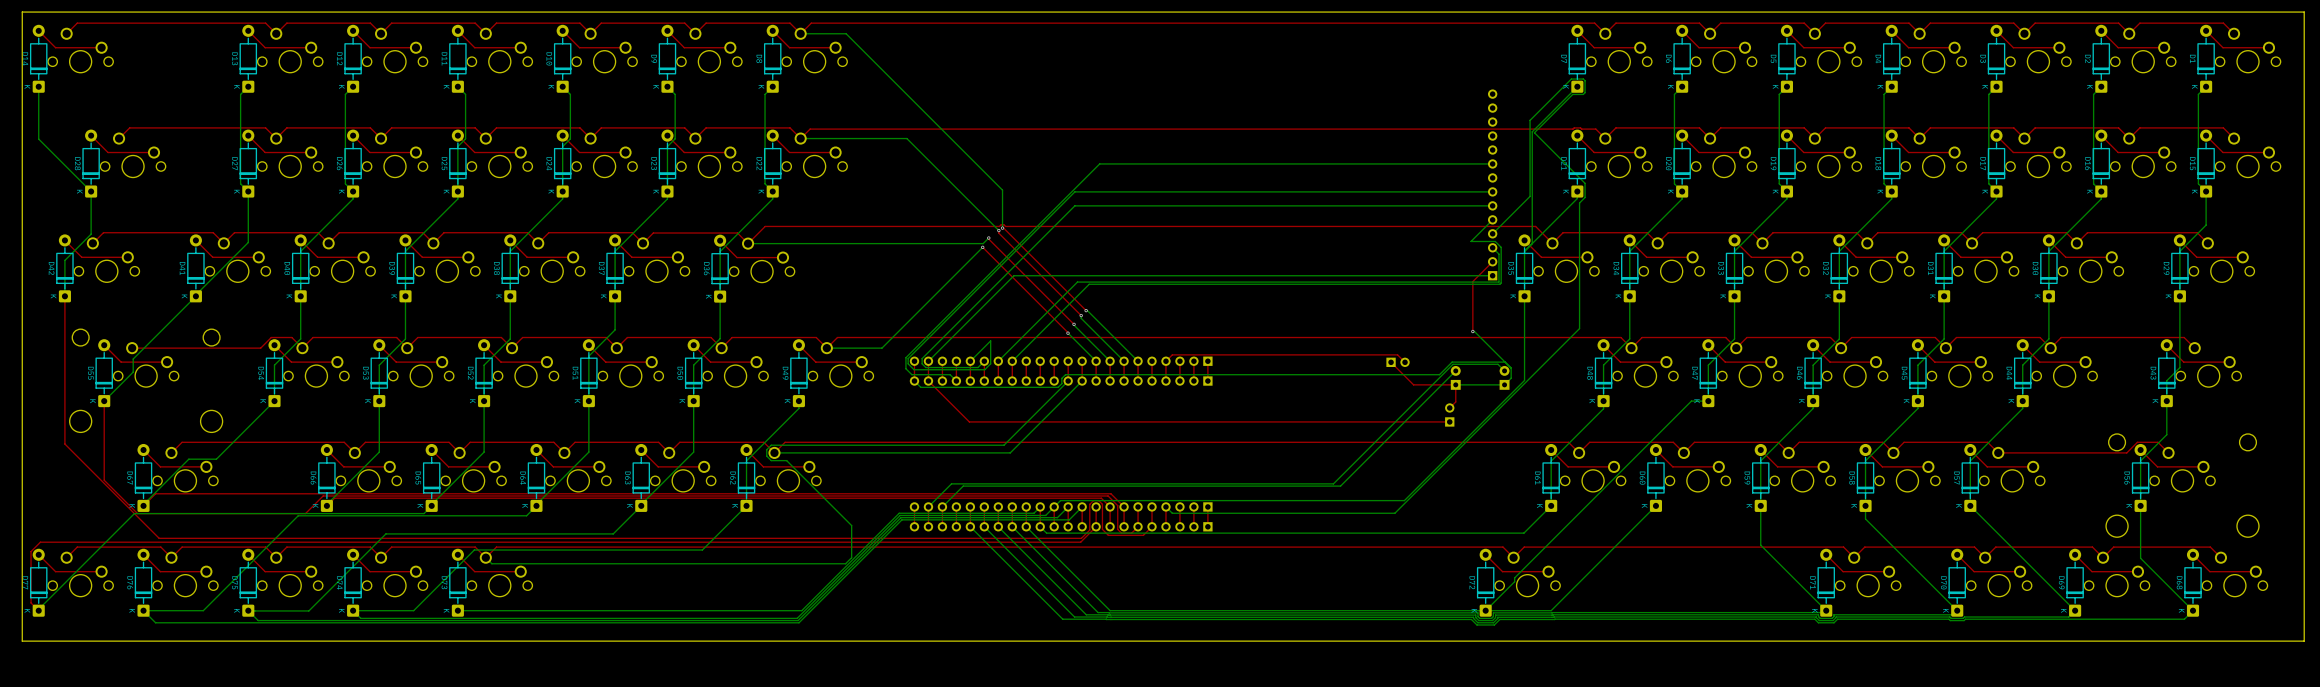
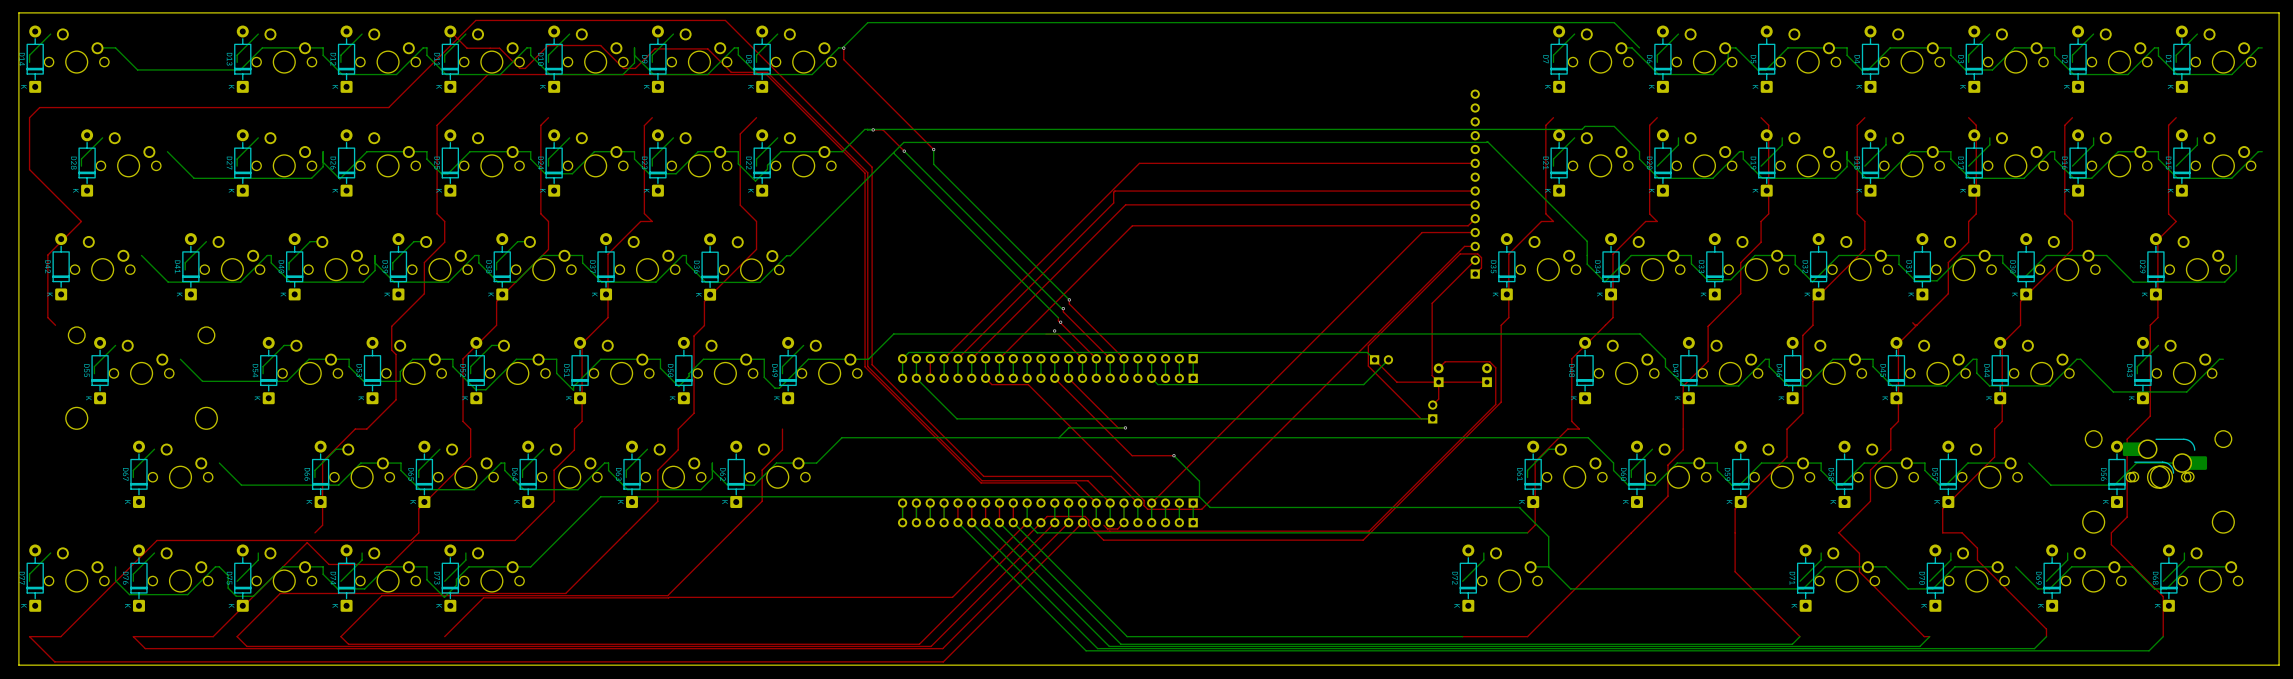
top track: (38, 30) (55, 47) (101, 47) -> none
top track: (248, 30) (265, 47) (311, 47) -> none
top track: (353, 30) (369, 47) (415, 47) -> none
top track: (562, 30) (579, 47) (625, 47) -> none
top track: (667, 30) (684, 47) (730, 47) -> none
top track: (772, 30) (789, 47) (835, 47) -> none
top track: (1577, 30) (1594, 47) (1640, 47) -> none
top track: (1682, 30) (1699, 47) (1745, 47) -> none
top track: (1786, 30) (1803, 47) (1849, 47) -> none
top track: (1891, 30) (1908, 47) (1954, 47) -> none
top track: (1996, 30) (2013, 47) (2059, 47) -> none
top track: (2101, 30) (2118, 47) (2164, 47) -> none
top track: (2206, 30) (2222, 47) (2268, 47) -> none
bottom track: none -> (50, 34) (29, 55) (29, 62)
bottom track: none -> (258, 34) (237, 55) (237, 62)
bottom track: none -> (362, 34) (340, 55) (340, 62)
bottom track: none -> (465, 34) (444, 55) (444, 62)
bottom track: none -> (569, 34) (548, 55) (548, 62)
bottom track: none -> (673, 34) (652, 55) (652, 62)
bottom track: none -> (777, 34) (756, 55) (756, 62)
bottom track: (800, 33) (846, 33) (1002, 190) (1002, 228) -> none
bottom track: none -> (1574, 34) (1553, 55) (1553, 62)
bottom track: none -> (1678, 34) (1657, 55) (1657, 62)
bottom track: none -> (1989, 34) (1968, 55) (1968, 62)
bottom track: none -> (2093, 34) (2072, 55) (2072, 62)
bottom track: none -> (2197, 34) (2176, 55) (2176, 62)
top track: (2234, 33) (2223, 23) (2139, 23) (2129, 33) (2118, 23) (2035, 23) (2024, 33) (2013, 23) (1930, 23) (1919, 33) (1909, 23) (1825, 23) (1814, 33) (1804, 23) (1720, 23) (1710, 33) (1699, 23) (1615, 23) (1605, 33) (1594, 23) (811, 23) (800, 33) (790, 23) (706, 23) (695, 33) (684, 23) (601, 23) (590, 33) (580, 23) (496, 23) (485, 33) (475, 23) (391, 23) (381, 33) (370, 23) (286, 23) (276, 33) (265, 23) (77, 23) (66, 33) -> none
bottom track: none -> (634, 47) (634, 62) (622, 74) (549, 74) (530, 55) (530, 47) (526, 47) (500, 74) (446, 74) (426, 55) (426, 47) (423, 47) (396, 74) (342, 74) (323, 55) (323, 47) (262, 47) (240, 69) (137, 69) (115, 47) (100, 47)
top track: none -> (843, 48) (843, 59) (933, 149)
via: none -> (843, 48)
bottom track: none -> (1639, 47) (1614, 22) (867, 22) (812, 74) (757, 74) (738, 54) (738, 47) (734, 47) (707, 74) (653, 74) (634, 55)
bottom track: none -> (2262, 47) (2258, 47) (2231, 74) (2177, 74) (2158, 55) (2158, 47) (2154, 47) (2127, 74) (2073, 74) (2054, 55) (2054, 47) (2014, 47) (1992, 69) (1965, 69) (1950, 55) (1950, 47) (1890, 47) (1868, 69) (1861, 69) (1847, 55) (1847, 47) (1787, 47) (1765, 69) (1757, 69) (1735, 47) (1728, 47) (1728, 59) (1712, 74) (1658, 74) (1632, 47) (1624, 47)
bottom track: (38, 86) (38, 139) (91, 191) (91, 234) (64, 260) (64, 296) -> none
bottom track: (248, 86) (240, 94) (240, 183) (248, 191) (248, 242) (133, 359) (133, 372) (104, 401) -> none
bottom track: (353, 86) (345, 94) (345, 183) (353, 191) (353, 198) (300, 251) (300, 338) (274, 365) (274, 401) (216, 459) (188, 459) (143, 505) -> none
bottom track: (457, 86) (465, 94) (465, 138) (457, 146) (457, 198) (405, 251) (405, 338) (379, 365) (379, 452) (326, 505) -> none
bottom track: (562, 86) (570, 94) (570, 138) (562, 146) (562, 198) (510, 251) (510, 338) (484, 365) (484, 452) (423, 513) (134, 513) (38, 610) -> none
bottom track: (667, 86) (675, 94) (675, 138) (667, 146) (667, 198) (615, 251) (615, 329) (588, 356) (588, 452) (536, 505) (526, 515) (298, 515) (203, 610) (143, 610) (155, 622) (799, 622) (901, 519) (1069, 519) (1082, 506) -> (1068, 522) (1068, 503)
bottom track: (772, 86) (765, 94) (765, 183) (772, 191) (772, 198) (720, 251) (720, 338) (693, 365) (693, 452) (613, 533) (385, 533) (308, 610) (248, 610) (258, 620) (798, 620) (901, 517) (1057, 517) (1068, 506) -> (1054, 522) (1054, 503)
bottom track: (1577, 86) (1532, 131) (1532, 243) -> none
bottom track: (1682, 86) (1674, 94) (1674, 183) (1682, 191) (1682, 198) (1629, 251) (1629, 338) (1603, 365) (1603, 408) (1551, 461) (1551, 505) (1523, 533) (1046, 533) -> (1527, 532) (1037, 532) (1033, 528)
bottom track: (1786, 86) (1779, 94) (1779, 183) (1786, 191) (1786, 198) (1734, 251) (1734, 338) (1708, 365) (1708, 401) (1691, 401) (1514, 577) (1514, 581) (1485, 610) -> none
bottom track: (1891, 86) (1884, 94) (1884, 183) (1891, 191) (1891, 198) (1839, 251) (1839, 338) (1813, 365) (1813, 408) (1760, 460) (1760, 545) (1826, 610) (1824, 612) (1493, 612) (1491, 618) (1479, 618) (1477, 612) (1098, 612) -> (1799, 636) (1792, 644) (1121, 644) (1084, 607)
bottom track: (1996, 86) (1988, 94) (1988, 183) (1996, 191) (1996, 198) (1944, 251) (1944, 338) (1917, 365) (1917, 408) (1865, 460) (1865, 518) (1957, 610) (1953, 614) (1833, 614) (1832, 618) (1820, 618) (1818, 614) (1495, 615) (1492, 620) (1478, 620) (1475, 615) (1086, 614) -> (1929, 636) (1919, 646) (1109, 646) (1072, 609)
bottom track: (2101, 86) (2093, 94) (2093, 183) (2101, 191) (2101, 198) (2048, 251) (2048, 338) (2022, 365) (2022, 408) (1970, 460) (1970, 505) (2075, 610) (2068, 617) (1836, 617) (1833, 620) (1819, 620) (1816, 617) (1497, 617) (1493, 622) (1477, 622) (1473, 617) (1074, 617) -> (2046, 636) (2034, 648) (1097, 648) (1061, 612)
bottom track: (2206, 86) (2198, 94) (2198, 183) (2206, 191) (2206, 225) (2179, 251) (2179, 367) (2166, 380) (2166, 434) (2140, 460) (2140, 558) (2193, 610) (2184, 619) (1837, 619) (1834, 622) (1818, 622) (1814, 619) (1499, 619) (1494, 624) (1476, 624) (1471, 619) (1062, 619) -> (2163, 636) (2149, 650) (1086, 650) (1049, 614)
top track: none -> (1553, 117) (1545, 125) (1545, 213) (1553, 221) (1541, 221) (1508, 254) (1508, 317) (1501, 325) (1501, 402) (1363, 540) (1103, 540) (1094, 531)
top track: none -> (1657, 117) (1649, 125) (1649, 213) (1657, 221) (1645, 221) (1613, 254) (1613, 317) (1571, 358) (1571, 421) (1579, 429) (1567, 429) (1535, 461) (1535, 525) (1527, 532)
top track: none -> (1761, 117) (1768, 125) (1768, 213) (1761, 221) (1761, 242) (1740, 262) (1740, 293) (1708, 326) (1708, 361) (1683, 386) (1683, 449) (1667, 465) (1667, 496) (1527, 636) (1462, 636)
top track: none -> (1864, 117) (1857, 125) (1857, 213) (1864, 221) (1864, 249) (1812, 301) (1812, 325) (1802, 335) (1802, 413) (1787, 429) (1787, 457) (1735, 508) (1735, 571) (1799, 636)
top track: none -> (1968, 117) (1976, 125) (1976, 213) (1968, 221) (1968, 242) (1948, 262) (1948, 293) (1898, 343) (1898, 421) (1890, 429) (1890, 449) (1870, 470) (1870, 501) (1838, 532) (1859, 553) (1859, 571) (1924, 636) (1929, 636)
top track: none -> (2072, 117) (2064, 125) (2064, 213) (2072, 221) (2072, 249) (2020, 301) (2020, 325) (2002, 343) (2002, 421) (1994, 429) (1994, 457) (1942, 508) (1942, 532) (1962, 532) (1977, 548) (1977, 560) (2046, 629) (2046, 636)
top track: none -> (2176, 117) (2168, 125) (2168, 213) (2176, 221) (2157, 239) (2157, 317) (2150, 325) (2150, 416) (2127, 439) (2127, 517) (2111, 532) (2111, 544) (2163, 596) (2163, 636)
bottom track: none -> (867, 129) (873, 129)
top track: none -> (873, 129) (883, 129) (904, 151)
via: none -> (873, 129)
top track: (91, 135) (108, 152) (153, 152) -> none
top track: (248, 135) (265, 152) (311, 152) -> none
top track: (353, 135) (369, 152) (415, 152) -> none
top track: (457, 135) (474, 152) (520, 152) -> none
top track: (562, 135) (579, 152) (625, 152) -> none
top track: (667, 135) (684, 152) (730, 152) -> none
top track: (772, 135) (789, 152) (835, 152) -> none
top track: (1577, 135) (1594, 152) (1640, 152) -> none
top track: (1682, 135) (1699, 152) (1745, 152) -> none
top track: (1786, 135) (1803, 152) (1849, 152) -> none
top track: (1891, 135) (1908, 152) (1954, 152) -> none
top track: (1996, 135) (2013, 152) (2059, 152) -> none
top track: (2101, 135) (2118, 152) (2164, 152) -> none
top track: (2206, 135) (2222, 152) (2268, 152) -> none
bottom track: none -> (102, 137) (81, 159) (81, 166)
bottom track: none -> (258, 137) (237, 159) (237, 166)
bottom track: none -> (569, 137) (548, 159) (548, 166)
bottom track: none -> (673, 137) (652, 159) (652, 166)
bottom track: none -> (777, 137) (756, 159) (756, 166)
bottom track: (800, 138) (906, 138) (998, 230) -> none
bottom track: none -> (1574, 137) (1553, 159) (1553, 166)
bottom track: none -> (1678, 137) (1678, 144) (1657, 166)
bottom track: none -> (1782, 137) (1782, 144) (1761, 166)
bottom track: none -> (1886, 137) (1886, 144) (1864, 166)
bottom track: none -> (1989, 137) (1989, 144) (1968, 166)
bottom track: none -> (2093, 137) (2093, 144) (2072, 166)
bottom track: none -> (2197, 137) (2197, 144) (2176, 166)
top track: (2234, 138) (2223, 127) (2139, 127) (2129, 138) (2118, 127) (2035, 127) (2024, 138) (2013, 127) (1930, 127) (1919, 138) (1909, 127) (1825, 127) (1814, 138) (1804, 127) (1720, 127) (1710, 138) (1699, 127) (1615, 127) (1605, 138) (1595, 129) (1580, 127) (810, 129) (800, 138) (790, 127) (706, 127) (695, 138) (684, 127) (601, 127) (590, 138) (580, 127) (496, 127) (485, 138) (475, 127) (391, 127) (381, 138) (370, 127) (286, 127) (276, 138) (265, 127) (129, 127) (119, 138) -> none
bottom track: none -> (933, 149) (933, 164) (1069, 299)
via: none -> (933, 149)
bottom track: none -> (904, 151) (1063, 308)
via: none -> (904, 151)
bottom track: none -> (323, 151) (323, 166) (311, 178) (194, 178) (167, 151)
bottom track: none -> (1847, 151) (1847, 166) (1835, 178) (1762, 178) (1743, 159) (1743, 151) (1739, 151) (1712, 178) (1658, 178) (1639, 159) (1639, 151) (1614, 126) (1585, 126) (1582, 129) (864, 129) (842, 151) (781, 151) (755, 181) (738, 163) (738, 151) (698, 151) (676, 173) (649, 173) (634, 159) (634, 151) (594, 151) (572, 173) (545, 173) (530, 159) (530, 151) (470, 151) (447, 173) (441, 173) (426, 159) (426, 151) (367, 151) (339, 178) (323, 162)
bottom track: none -> (2262, 151) (2258, 151) (2231, 178) (2177, 178) (2158, 159) (2158, 151) (2118, 151) (2091, 178) (2073, 178) (2054, 159) (2054, 151) (2050, 151) (2024, 178) (1970, 178) (1950, 159) (1950, 151) (1910, 151) (1884, 178) (1866, 178) (1847, 159)
bottom track: none -> (893, 152) (1058, 317)
bottom track: (1492, 163) (1099, 163) (905, 357) (905, 368) (911, 374) (950, 374) (956, 381) -> (944, 358) (944, 378)
bottom track: (1492, 191) (1074, 191) (908, 358) (908, 363) (914, 369) (984, 369) (990, 363) (990, 340) (970, 361) -> (957, 378) (957, 358)
bottom track: (1577, 191) (1577, 198) (1524, 251) (1524, 380) (1404, 500) (1214, 500) -> none
bottom track: (1492, 205) (1074, 205) (922, 358) (922, 363) (925, 367) (978, 367) (984, 361) -> (971, 378) (971, 358)
bottom track: (1492, 219) (1471, 241) (1495, 241) (1501, 247) (1499, 284) (1089, 284) (1012, 361) -> (999, 378) (999, 358)
top track: (1002, 228) (1086, 310) -> none
via: (1002, 228) -> none
top track: (998, 230) (998, 233) (1081, 315) -> none
via: (998, 230) -> none
bottom track: (1492, 233) (1530, 196) (1530, 120) (1571, 79) (1583, 79) (1585, 80) (1585, 92) (1572, 94) (1534, 132) (1585, 183) (1585, 197) (1579, 202) (1579, 328) (1394, 513) (1172, 513) (1165, 506) -> (1151, 522) (1151, 503)
top track: (988, 238) (1074, 324) -> none
bottom track: (988, 238) (983, 243) (748, 243) -> none
via: (988, 238) -> none
top track: (64, 240) (81, 257) (127, 257) -> none
top track: (195, 240) (212, 257) (258, 257) -> none
top track: (300, 240) (317, 257) (363, 257) -> none
top track: (405, 240) (422, 257) (468, 257) -> none
top track: (510, 240) (527, 257) (573, 257) -> none
top track: (615, 240) (631, 257) (677, 257) -> none
top track: (720, 240) (737, 257) (782, 257) -> none
top track: (1524, 240) (1541, 257) (1587, 257) -> none
top track: (1629, 240) (1646, 257) (1692, 257) -> none
top track: (1734, 240) (1751, 257) (1797, 257) -> none
top track: (1839, 240) (1856, 257) (1902, 257) -> none
top track: (1944, 240) (1961, 257) (2007, 257) -> none
top track: (2048, 240) (2065, 257) (2111, 257) -> none
top track: (2179, 240) (2196, 257) (2242, 257) -> none
bottom track: none -> (206, 241) (185, 262) (185, 269)
bottom track: none -> (325, 241) (310, 241) (289, 262) (289, 269)
bottom track: none -> (429, 241) (413, 241) (392, 262) (392, 269)
bottom track: none -> (532, 241) (517, 241) (496, 262) (496, 269)
top track: (2207, 243) (2197, 232) (2087, 232) (2076, 243) (2066, 232) (1982, 232) (1972, 243) (1961, 232) (1877, 232) (1867, 243) (1856, 232) (1773, 232) (1762, 243) (1751, 232) (1668, 232) (1657, 243) (1647, 232) (1563, 232) (1552, 243) (1535, 226) (1005, 226) (1003, 224) (999, 226) (765, 226) (748, 243) (737, 233) (653, 233) (643, 243) (632, 232) (548, 232) (538, 243) (527, 232) (444, 232) (433, 243) (422, 232) (339, 232) (328, 243) (318, 232) (234, 232) (223, 243) (213, 232) (103, 232) (92, 243) -> none
top track: (982, 247) (1067, 333) -> none
bottom track: (982, 247) (881, 348) (826, 348) -> none
via: (982, 247) -> none
bottom track: (1492, 247) (1498, 254) (1498, 282) (1077, 282) (998, 361) -> (985, 378) (985, 358)
bottom track: none -> (375, 255) (375, 270) (363, 282) (290, 282) (271, 262) (271, 255) (267, 255) (240, 282) (168, 282) (141, 255)
bottom track: none -> (2236, 255) (2236, 270) (2224, 282) (2133, 282) (2106, 255) (2046, 255) (2024, 277) (2017, 277) (2002, 262) (2002, 255) (1962, 255) (1937, 280) (1915, 280) (1898, 264) (1898, 255) (1838, 255) (1812, 281) (1795, 264) (1795, 255) (1755, 255) (1730, 279) (1707, 279) (1691, 263) (1691, 255) (1631, 255) (1604, 281) (1587, 264) (1587, 241) (1487, 141) (903, 142) (790, 255) (786, 255) (760, 282) (705, 282) (686, 262) (686, 255) (682, 255) (655, 282) (601, 282) (582, 262) (582, 255) (542, 255) (515, 282) (498, 282) (478, 262) (478, 255) (475, 255) (448, 282) (394, 282) (375, 262)
bottom track: (1492, 275) (1013, 275) (928, 361) -> (1432, 418) (956, 418) (916, 378) (916, 358)
top track: (1472, 281) (1472, 331) -> (1455, 279) (1432, 303) (1432, 375) (1438, 382) (1487, 382)
top track: (64, 296) (64, 444) (159, 538) (1081, 538) (1089, 530) (1089, 504) (1093, 500) (1098, 500) (1102, 504) (1102, 524) -> (782, 429) (782, 449) (762, 470) (762, 501) (667, 595) (381, 595) (340, 636) (348, 644) (919, 644) (1047, 516) (1085, 516) (1088, 520)
via: none -> (1069, 299)
via: none -> (1063, 308)
bottom track: (1086, 310) (1138, 361) -> (1124, 378) (1124, 358)
via: (1086, 310) -> none
bottom track: (1081, 315) (1081, 318) (1124, 361) -> (1110, 378) (1110, 358)
via: (1081, 315) -> none
bottom track: (1074, 324) (1110, 361) -> (1096, 378) (1096, 358)
top track: none -> (1912, 322) (1916, 325)
top track: none -> (55, 325) (47, 317) (47, 255) (81, 221) (29, 169) (29, 117) (39, 107) (388, 107) (475, 20) (725, 20) (872, 167) (872, 364) (983, 476) (1111, 476) (1137, 503)
bottom track: (1472, 331) (1511, 368) (1511, 378) (1504, 384) (1455, 384) -> none
via: (1472, 331) -> none
bottom track: (1068, 333) (1096, 361) -> (1082, 378) (1082, 358)
top track: (104, 345) (121, 362) (167, 362) -> none
top track: (274, 345) (291, 362) (337, 362) -> none
top track: (379, 345) (396, 362) (442, 362) -> none
top track: (484, 345) (500, 362) (546, 362) -> none
top track: (588, 345) (605, 362) (651, 362) -> none
top track: (693, 345) (710, 362) (756, 362) -> none
top track: (798, 345) (815, 362) (861, 362) -> none
top track: (1603, 345) (1620, 362) (1666, 362) -> none
top track: (1708, 345) (1725, 362) (1771, 362) -> none
top track: (1813, 345) (1830, 362) (1876, 362) -> none
top track: (1917, 345) (1934, 362) (1980, 362) -> none
top track: (2022, 345) (2039, 362) (2085, 362) -> none
top track: (2166, 345) (2183, 362) (2229, 362) -> none
bottom track: none -> (115, 345) (94, 366) (94, 373)
bottom track: none -> (299, 345) (284, 345) (263, 366) (263, 373)
bottom track: none -> (506, 345) (491, 345) (470, 366) (470, 373)
bottom track: none -> (803, 345) (782, 366) (782, 373)
bottom track: none -> (2158, 345) (2137, 366) (2137, 373)
top track: (2194, 348) (2184, 337) (2061, 337) (2050, 348) (2040, 337) (1956, 337) (1945, 348) (1935, 337) (1851, 337) (1841, 348) (1830, 337) (1746, 337) (1736, 348) (1725, 337) (1642, 337) (1631, 348) (1620, 337) (837, 337) (826, 348) (816, 337) (732, 337) (721, 348) (710, 337) (627, 337) (616, 348) (606, 337) (522, 337) (512, 348) (501, 337) (417, 337) (407, 348) (396, 337) (313, 337) (302, 348) (291, 337) (271, 337) (260, 348) (132, 348) -> none
top track: (914, 361) (914, 381) -> none
top track: (928, 361) (928, 381) (969, 421) (1438, 421) -> (1475, 274) (1481, 267) (1481, 257) (1477, 253) (1460, 253) (1368, 345) (1368, 366) (1421, 418)
top track: (956, 361) (956, 381) -> (944, 358) (1139, 163) (1475, 163)
top track: (970, 361) (970, 381) -> (957, 358) (1113, 202) (1114, 191) (1475, 191)
top track: (984, 361) (984, 381) -> (971, 358) (1125, 204) (1475, 204)
top track: (998, 361) (998, 381) -> (1475, 246) (1464, 246) (1201, 509) (1147, 509) (1144, 505) (1144, 500) (1028, 384) (991, 384) (985, 378)
top track: (1012, 361) (1012, 381) -> (999, 358) (1132, 225) (1468, 225) (1475, 218)
top track: (1026, 361) (1026, 381) -> none
bottom track: none -> (1013, 358) (1013, 378)
top track: (1040, 361) (1040, 381) -> none
bottom track: none -> (1027, 358) (1027, 378)
top track: (1054, 361) (1054, 381) -> none
bottom track: none -> (1040, 358) (1040, 378)
top track: (1068, 361) (1068, 381) -> (1173, 455) (1132, 455) (1054, 378)
top track: (1082, 361) (1082, 381) -> (1125, 427) (1118, 427) (1068, 378)
top track: (1096, 361) (1096, 381) -> (1082, 358) (1057, 334) (1045, 334)
top track: (1110, 361) (1110, 381) -> (1096, 358) (1058, 320) (1058, 317)
top track: (1124, 361) (1124, 381) -> (1110, 358) (1063, 311) (1063, 308)
top track: (1138, 361) (1138, 381) -> (1124, 358) (1069, 304) (1069, 299)
top track: (1152, 361) (1152, 381) -> none
bottom track: none -> (1137, 358) (1137, 378)
bottom track: none -> (1151, 358) (1151, 378) (1157, 384) (1363, 384) (1388, 359)
top track: (1179, 361) (1179, 381) -> none
bottom track: none -> (1165, 358) (1165, 378)
top track: (1193, 361) (1193, 381) -> none
bottom track: none -> (1179, 358) (1179, 378)
top track: (1207, 361) (1207, 381) -> none
bottom track: none -> (1193, 358) (1193, 378)
bottom track: none -> (2223, 359) (2219, 359) (2186, 391) (2113, 391) (2080, 359) (2076, 359) (2050, 385) (1989, 385) (1976, 373) (1976, 359) (1973, 359) (1946, 385) (1892, 385) (1873, 366) (1873, 359) (1832, 359) (1806, 385) (1788, 385) (1769, 366) (1769, 359) (1765, 359) (1738, 385) (1684, 385) (1665, 366) (1665, 359) (1640, 333) (893, 333) (868, 359) (808, 359) (779, 388) (775, 388) (764, 377) (764, 359) (703, 359) (678, 386) (660, 368) (660, 359) (600, 359) (573, 386) (573, 390) (556, 373) (556, 359) (516, 359) (485, 389) (475, 389) (452, 366) (452, 359) (412, 359) (400, 371) (400, 381) (363, 381) (349, 366) (349, 359) (308, 359) (286, 381) (202, 381) (180, 359)
top track: (1405, 362) (1397, 354) (1172, 354) (1165, 361) (1165, 381) -> none
bottom track: (1505, 362) (1452, 362) (1439, 374) (1065, 374) (1058, 387) (920, 387) (914, 381) -> (1374, 359) (1367, 352) (908, 352) (902, 358) (902, 378)
bottom track: (1455, 370) (1340, 486) (963, 486) (942, 506) -> (930, 522) (930, 503)
bottom track: (1504, 370) (1497, 364) (1453, 364) (1333, 483) (951, 483) (928, 506) -> (916, 522) (916, 503)
bottom track: (1068, 381) (1003, 445) (771, 445) (766, 449) (766, 456) (771, 460) (786, 460) (851, 525) (851, 557) (845, 563) (491, 563) (485, 557) -> (1054, 378) (1054, 358)
bottom track: (1082, 381) (1010, 452) (774, 452) -> (1068, 378) (1068, 358)
top track: (104, 401) (104, 480) (137, 513) (305, 513) (323, 495) (1108, 495) (1117, 505) (1117, 529) -> none
bottom track: (798, 401) (798, 408) (746, 460) (746, 505) (702, 550) (474, 550) (413, 610) (353, 610) (360, 618) (797, 618) (900, 515) (1045, 515) (1060, 500) -> (115, 566) (115, 580) (129, 594) (187, 594) (215, 566) (219, 566) (228, 575) (228, 588) (236, 596) (253, 596) (282, 566) (323, 566) (323, 574) (337, 588) (364, 588) (386, 566) (426, 566) (426, 579) (444, 597) (456, 585) (456, 579) (468, 566) (530, 566) (600, 496) (1047, 496)
bottom track: none -> (1125, 427) (1068, 427) (1058, 437)
via: none -> (1125, 427)
top track: (143, 450) (160, 466) (206, 466) -> none
top track: (326, 450) (343, 466) (389, 466) -> none
top track: (431, 450) (448, 466) (494, 466) -> none
top track: (536, 450) (553, 466) (599, 466) -> none
top track: (641, 450) (658, 466) (704, 466) -> none
top track: (746, 450) (763, 466) (809, 466) -> none
top track: (1551, 450) (1568, 466) (1614, 466) -> none
top track: (1655, 450) (1672, 466) (1718, 466) -> none
top track: (1760, 450) (1777, 466) (1823, 466) -> none
top track: (1865, 450) (1882, 466) (1928, 466) -> none
top track: (1970, 450) (1987, 466) (2033, 466) -> none
top track: (2140, 450) (2157, 466) (2203, 466) -> none
bottom track: none -> (154, 449) (133, 470) (133, 477)
bottom track: none -> (351, 449) (336, 449) (314, 470) (314, 477)
bottom track: none -> (439, 449) (418, 470) (418, 477)
bottom track: none -> (543, 449) (522, 470) (522, 477)
bottom track: none -> (647, 449) (626, 470) (626, 477)
bottom track: none -> (1563, 449) (1548, 449) (1527, 470) (1527, 477)
bottom track: none -> (1652, 449) (1631, 470) (1631, 477)
top track: (2168, 452) (2157, 442) (2137, 442) (2126, 452) (1998, 452) (1987, 442) (1904, 442) (1893, 452) (1882, 442) (1799, 442) (1788, 452) (1778, 442) (1694, 442) (1683, 452) (1673, 442) (1589, 442) (1579, 452) (1568, 442) (785, 442) (774, 452) (763, 442) (679, 442) (669, 452) (658, 442) (575, 442) (564, 452) (553, 442) (470, 442) (459, 452) (449, 442) (365, 442) (354, 452) (344, 442) (182, 442) (171, 452) -> none
bottom track: none -> (1173, 455) (1199, 481) (1199, 496) (1210, 507) (1519, 507)
via: none -> (1173, 455)
bottom track: none -> (712, 463) (712, 478) (700, 489) (627, 489) (608, 470) (608, 463) (604, 463) (577, 489) (523, 489) (504, 470) (504, 463) (500, 463) (474, 489) (420, 489) (400, 470) (400, 463) (360, 463) (338, 485) (241, 485) (219, 463)
bottom track: none -> (2013, 463) (1967, 463) (1945, 485) (1939, 485) (1924, 470) (1924, 463) (1864, 463) (1842, 485) (1835, 485) (1821, 470) (1821, 463) (1761, 463) (1739, 485) (1731, 485) (1717, 470) (1717, 463) (1677, 463) (1655, 485) (1628, 485) (1613, 470) (1613, 463) (1588, 437) (841, 437) (816, 463) (776, 463) (754, 485) (727, 485) (712, 470)
part: none -> (2164, 463)
bottom track: none -> (2182, 463) (2136, 463) (2114, 485) (2050, 485) (2028, 463)
top track: (1110, 493) (155, 493) (143, 505) -> (1097, 490) (1087, 480) (981, 480) (867, 366) (867, 172) (767, 72) (731, 72) (707, 48) (654, 48) (635, 68) (623, 68) (600, 45) (548, 45) (525, 68) (519, 68) (499, 48)
top track: (1101, 498) (334, 498) (326, 505) -> (1087, 494) (1076, 482) (981, 482) (865, 366) (865, 173) (766, 74) (487, 74) (437, 125) (437, 213) (444, 221) (444, 242) (424, 262) (424, 293) (391, 326) (391, 350) (396, 354) (396, 399) (366, 429) (355, 429) (322, 461) (322, 525) (314, 532)
bottom track: (1655, 505) (1551, 610) (1110, 610) -> (1462, 636) (1127, 636) (1096, 605)
bottom track: none -> (902, 503) (902, 522)
bottom track: none -> (944, 503) (944, 522)
top track: (1040, 506) (1040, 526) -> (444, 636) (483, 597) (952, 597) (1027, 522)
bottom track: (1040, 506) (1033, 513) (899, 513) (801, 610) (457, 610) -> (1027, 503) (1027, 522)
top track: (1054, 506) (1054, 526) -> none
top track: (1068, 506) (1068, 526) -> (756, 117) (740, 133) (740, 205) (756, 221) (756, 249) (704, 301) (704, 325) (694, 335) (694, 413) (678, 429) (678, 449) (657, 470) (657, 501) (565, 593) (280, 593) (237, 636) (246, 646) (931, 646) (1054, 522)
top track: (1082, 506) (1082, 526) -> (652, 117) (644, 125) (644, 213) (652, 221) (640, 221) (608, 254) (608, 317) (582, 343) (582, 421) (574, 429) (574, 449) (554, 470) (554, 501) (514, 540) (414, 540) (390, 564) (328, 564) (307, 542) (213, 636) (133, 636) (145, 648) (942, 648) (1068, 522)
top track: (1096, 506) (1096, 526) -> none
bottom track: none -> (1082, 503) (1082, 522)
bottom track: none -> (1096, 503) (1096, 522)
top track: (1124, 506) (1124, 526) -> none
bottom track: none -> (1110, 503) (1110, 522)
bottom track: none -> (1124, 503) (1124, 522)
top track: (1152, 506) (1152, 526) (1143, 535) -> (1438, 368) (1445, 361) (1489, 361) (1495, 367) (1495, 404) (1369, 531) (1129, 531)
bottom track: none -> (1137, 503) (1137, 522)
top track: (1165, 506) (1165, 526) -> (1151, 503) (1422, 232) (1475, 232)
top track: (1179, 506) (1179, 526) -> none
bottom track: none -> (1165, 503) (1165, 522)
top track: (1193, 506) (1193, 526) -> none
bottom track: none -> (1179, 503) (1179, 522)
top track: (1207, 506) (1207, 526) -> none
bottom track: none -> (1193, 503) (1193, 522)
bottom track: none -> (1519, 507) (1548, 536) (1548, 566)
top track: (1080, 542) (40, 542) (31, 551) (31, 602) (38, 610) -> (1067, 537) (943, 661) (54, 661) (29, 636) (60, 636) (157, 540) (411, 540) (418, 532) (418, 508) (470, 456) (470, 429) (463, 421) (463, 358) (496, 325) (496, 301) (548, 249) (548, 221) (540, 213) (540, 125) (548, 117)
top track: (38, 554) (55, 571) (101, 571) -> none
top track: (143, 554) (160, 571) (206, 571) -> none
top track: (248, 554) (265, 571) (311, 571) -> none
top track: (353, 554) (369, 571) (415, 571) -> none
top track: (457, 554) (474, 571) (520, 571) -> none
top track: (1485, 554) (1502, 571) (1548, 571) -> none
top track: (1826, 554) (1843, 571) (1889, 571) -> none
top track: (1957, 554) (1974, 571) (2020, 571) -> none
top track: (2075, 554) (2092, 571) (2137, 571) -> none
top track: (2193, 554) (2209, 571) (2255, 571) -> none
bottom track: none -> (50, 553) (29, 574) (29, 581)
bottom track: none -> (154, 553) (133, 574) (133, 581)
bottom track: none -> (258, 553) (258, 560) (237, 581)
bottom track: none -> (362, 553) (362, 560) (340, 581)
bottom track: none -> (465, 553) (465, 560) (444, 581)
bottom track: none -> (1483, 553) (1483, 560) (1462, 581)
bottom track: none -> (1821, 553) (1821, 560) (1799, 581)
bottom track: none -> (1950, 553) (1950, 560) (1929, 581)
bottom track: none -> (2067, 553) (2067, 560) (2046, 581)
bottom track: none -> (2184, 553) (2184, 560) (2163, 581)
top track: (2220, 557) (2210, 547) (2113, 547) (2103, 557) (2092, 547) (1995, 547) (1985, 557) (1974, 547) (1864, 547) (1854, 557) (1843, 547) (1524, 547) (1513, 557) (1503, 547) (496, 547) (485, 557) (475, 547) (391, 547) (381, 557) (370, 547) (286, 547) (276, 557) (265, 547) (182, 547) (171, 557) (160, 547) (77, 547) (66, 557) -> none
bottom track: none -> (1548, 566) (1533, 566)
bottom track: none -> (2000, 566) (1954, 566) (1932, 588) (1908, 588) (1886, 566) (1825, 566) (1803, 588) (1570, 588) (1548, 566)
bottom track: none -> (2234, 566) (2188, 566) (2166, 588) (2154, 588) (2132, 566) (2071, 566) (2049, 588) (2037, 588) (2015, 566)
board edge: (2304, 641) (22, 641) -> (2279, 635) (2279, 665) (18, 665) (18, 635)

